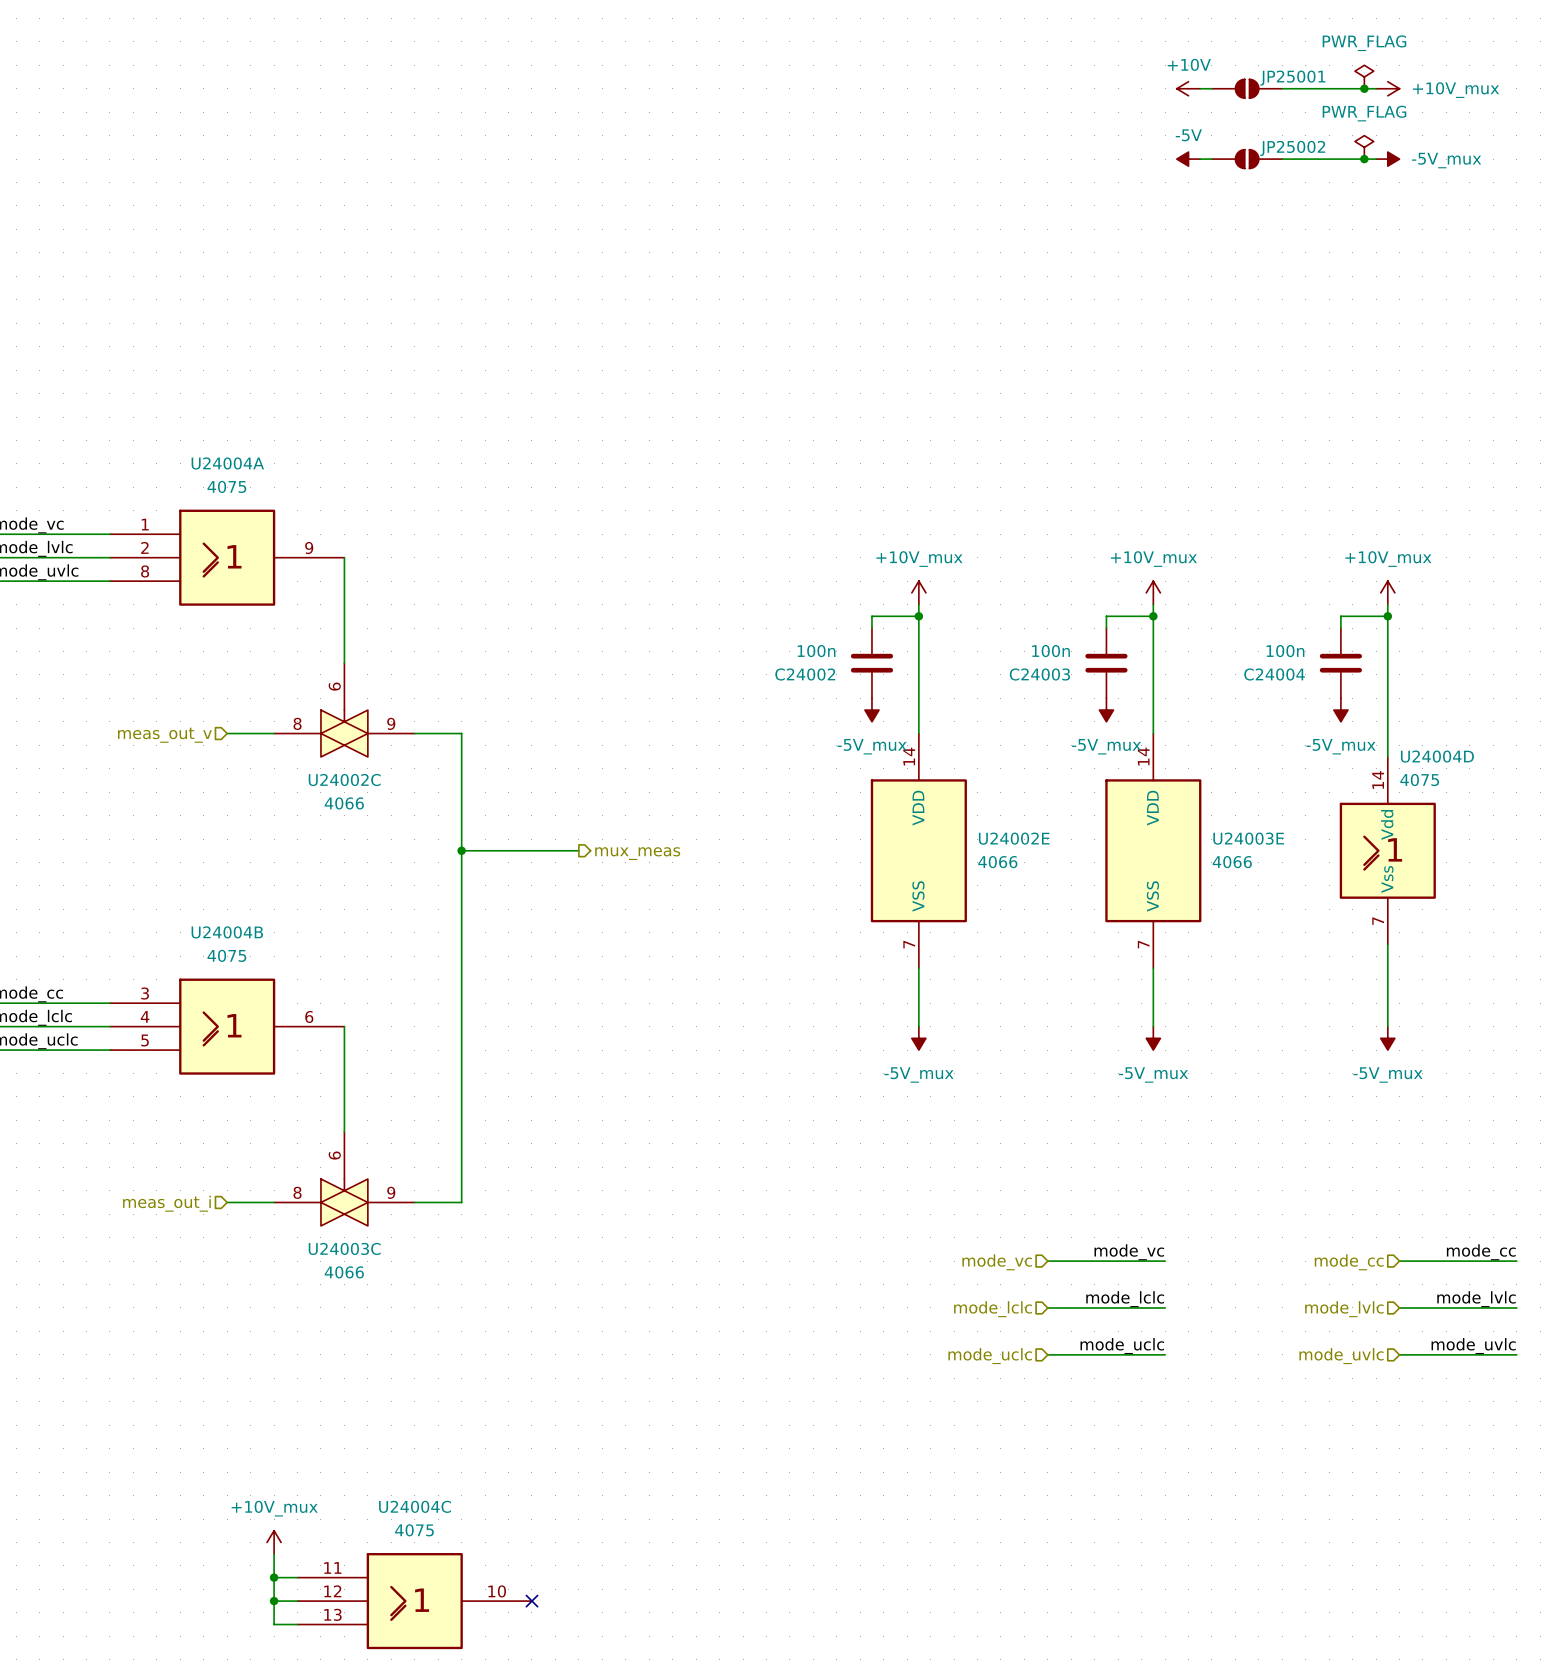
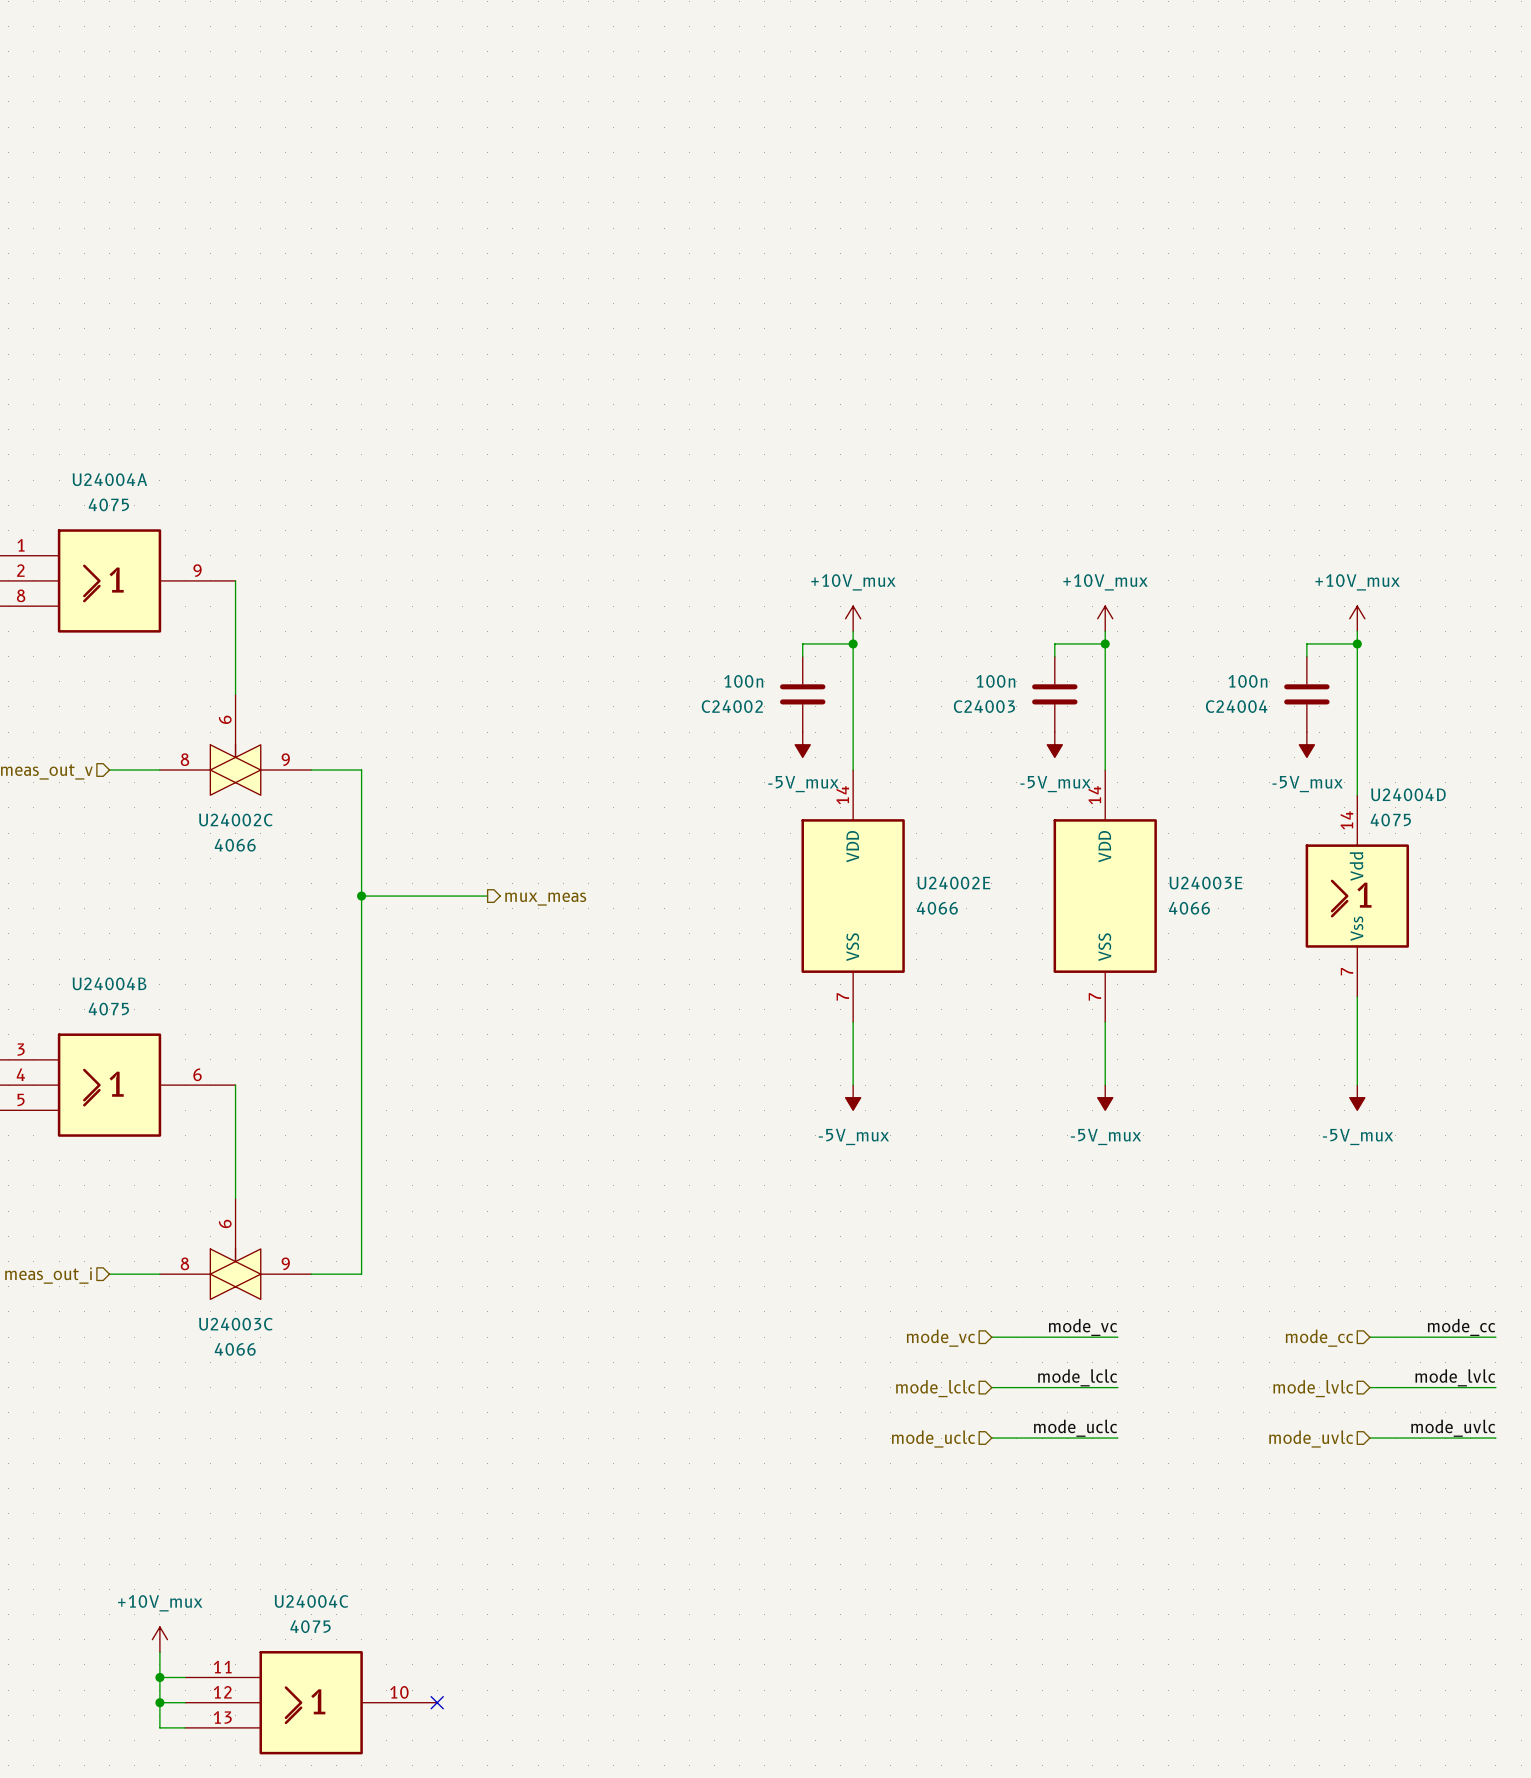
power symbol: PWR_FLAG (1364, 77) -> none
power symbol: +10V (1188, 88) -> none
wire: (1200, 88) (1211, 88) -> none
JP25001: (1247, 88) -> none
wire: (1282, 88) (1376, 88) -> none
junction: (1364, 88) -> none
power symbol: +10V_mux (1387, 88) -> none
power symbol: PWR_FLAG (1364, 147) -> none
power symbol: -5V (1188, 159) -> none
wire: (1200, 159) (1211, 159) -> none
JP25002: (1247, 159) -> none
wire: (1282, 159) (1376, 159) -> none
junction: (1364, 159) -> none
power symbol: -5V_mux (1387, 159) -> none

